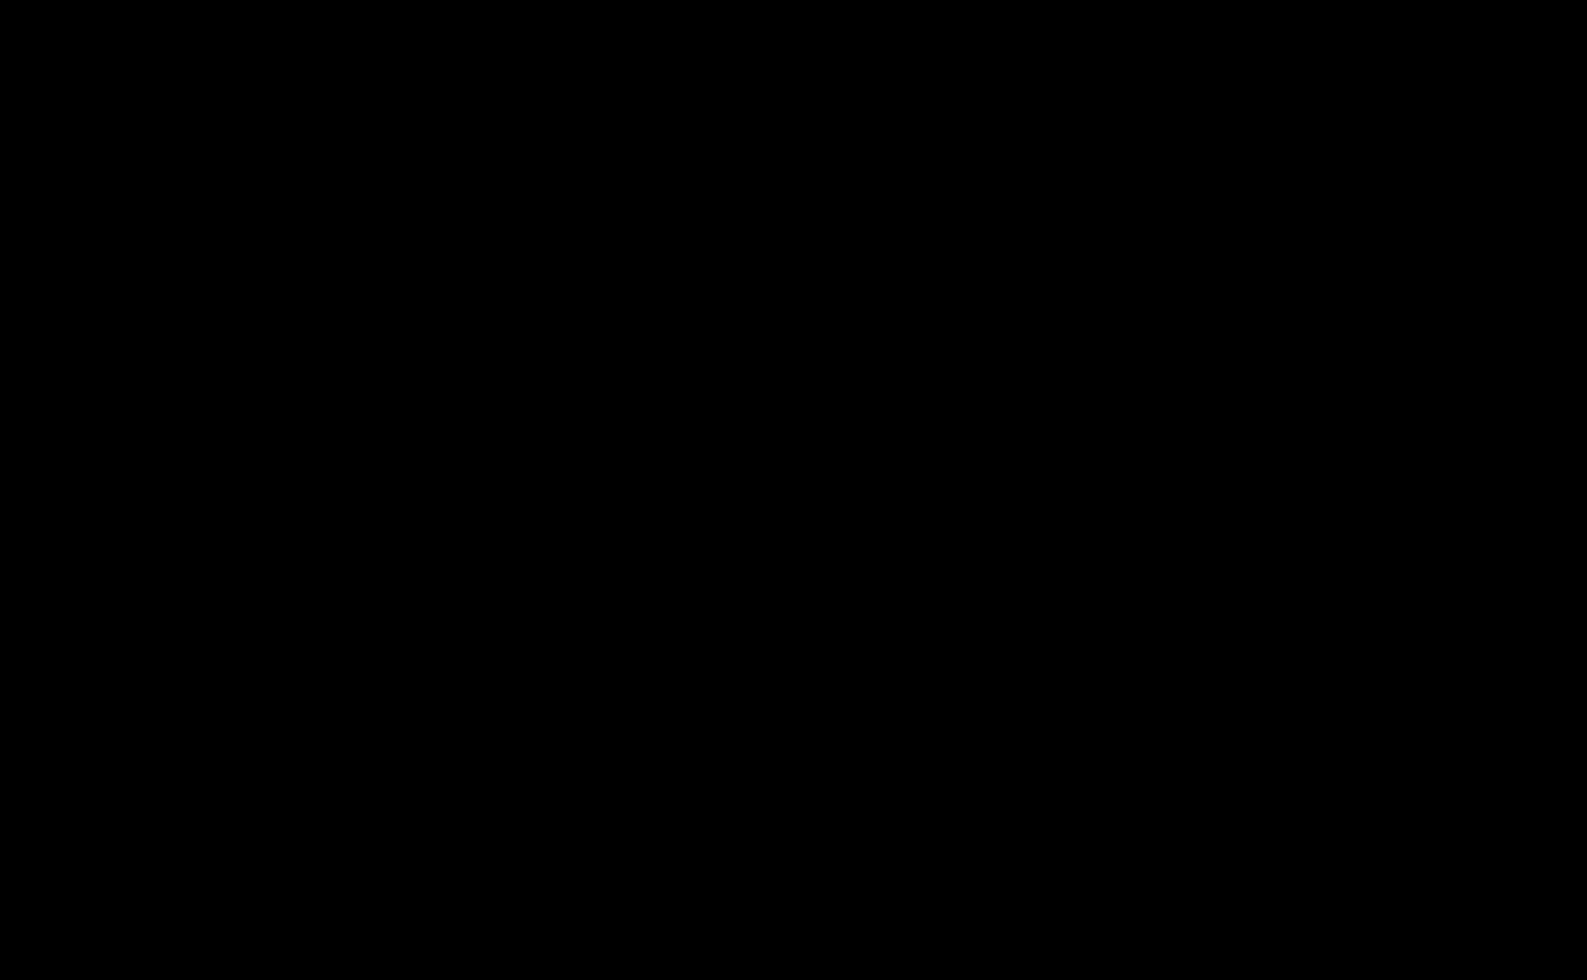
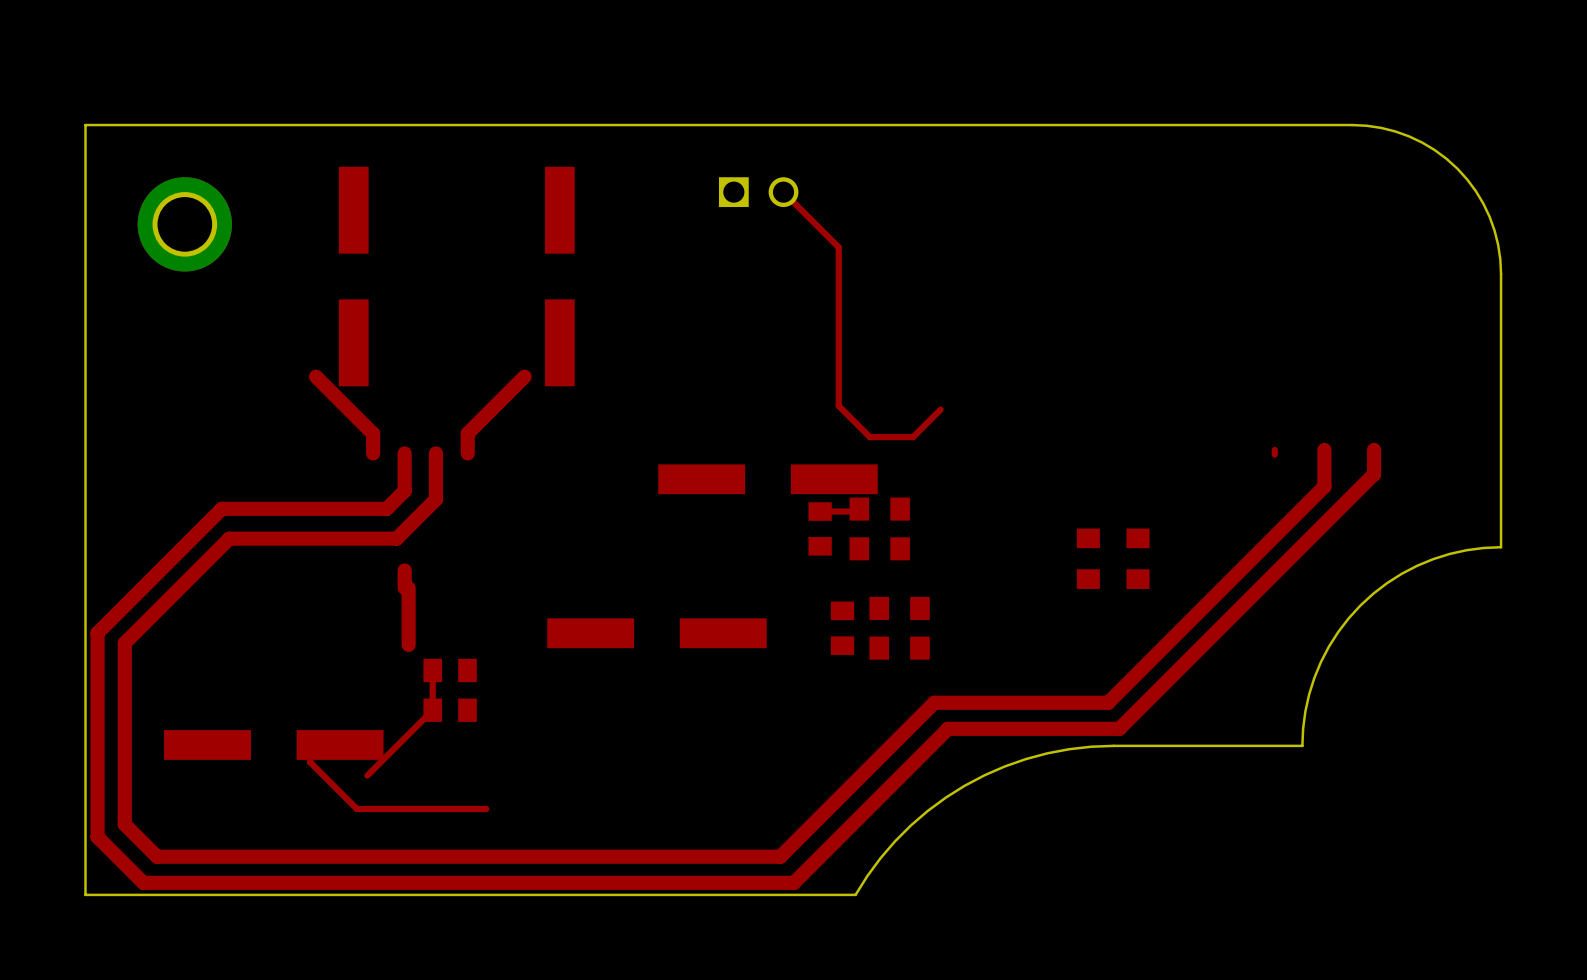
part: none -> (758, 192)
top track: none -> (783, 192) (838, 247) (838, 406) (869, 437) (913, 437) (940, 409)
part: none -> (184, 224)
part: none -> (353, 276)
part: none -> (559, 276)
top track: none -> (316, 376) (373, 433) (373, 453)
top track: none -> (524, 376) (467, 433) (467, 453)
top track: none -> (1274, 449) (1274, 454)
top track: none -> (1324, 449) (1324, 486) (1108, 702) (934, 702) (780, 856) (157, 856) (124, 824) (124, 643) (229, 538) (396, 538) (435, 499) (435, 453)
top track: none -> (1374, 449) (1374, 474) (1119, 728) (948, 728) (794, 882) (143, 882) (97, 836) (97, 633) (221, 508) (386, 508) (404, 490) (404, 453)
part: none -> (767, 479)
top track: none -> (859, 509) (856, 511) (820, 511)
part: none -> (879, 509)
part: none -> (820, 528)
part: none -> (879, 548)
part: none -> (1088, 558)
part: none -> (1138, 558)
top track: none -> (404, 570) (404, 588)
top track: none -> (408, 588) (408, 644)
part: none -> (899, 608)
part: none -> (842, 628)
part: none -> (656, 633)
part: none -> (899, 648)
top track: none -> (432, 669) (432, 710) (367, 775)
part: none -> (450, 670)
part: none -> (450, 710)
part: none -> (273, 744)
top track: none -> (310, 760) (356, 808) (486, 808)
board edge: none -> (855, 894) (880, 858) (895, 841) (927, 810) (945, 797) (984, 775) (1025, 759) (1047, 753) (1091, 746) (1302, 745) (1305, 711) (1309, 694) (1320, 661) (1338, 631) (1360, 605) (1387, 583) (1417, 565) (1433, 559) (1466, 550) (1501, 547) (1500, 259) (1494, 230) (1483, 203) (1457, 168) (1434, 150) (1409, 136) (1381, 127) (1352, 125) (85, 125) (85, 894) (855, 894)

